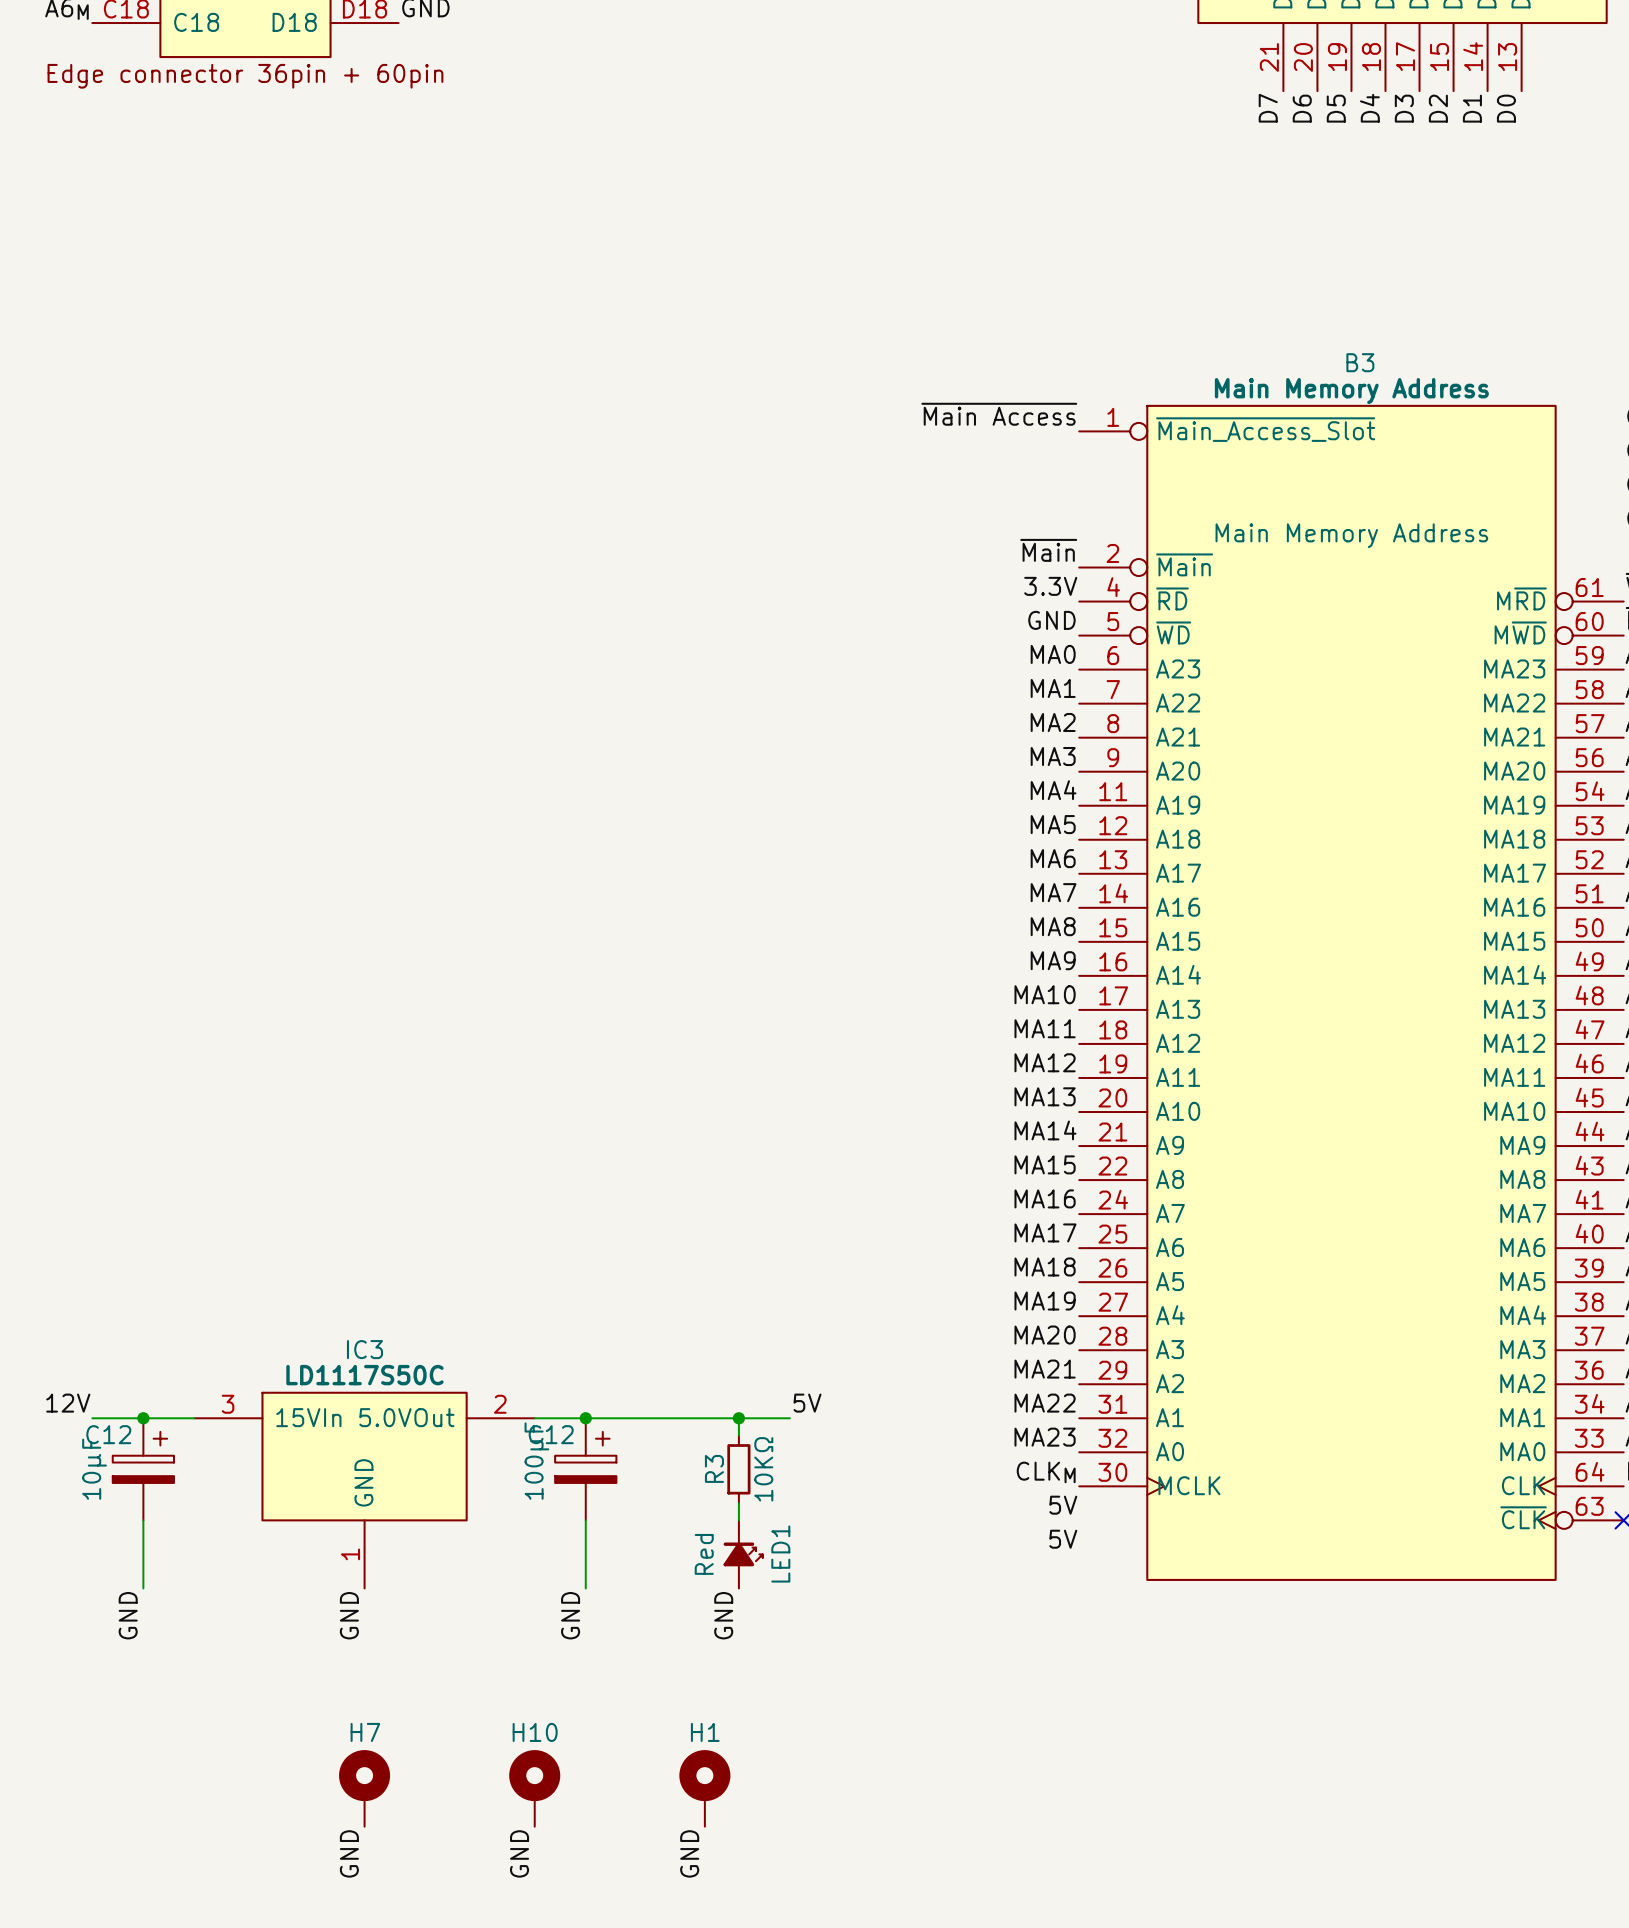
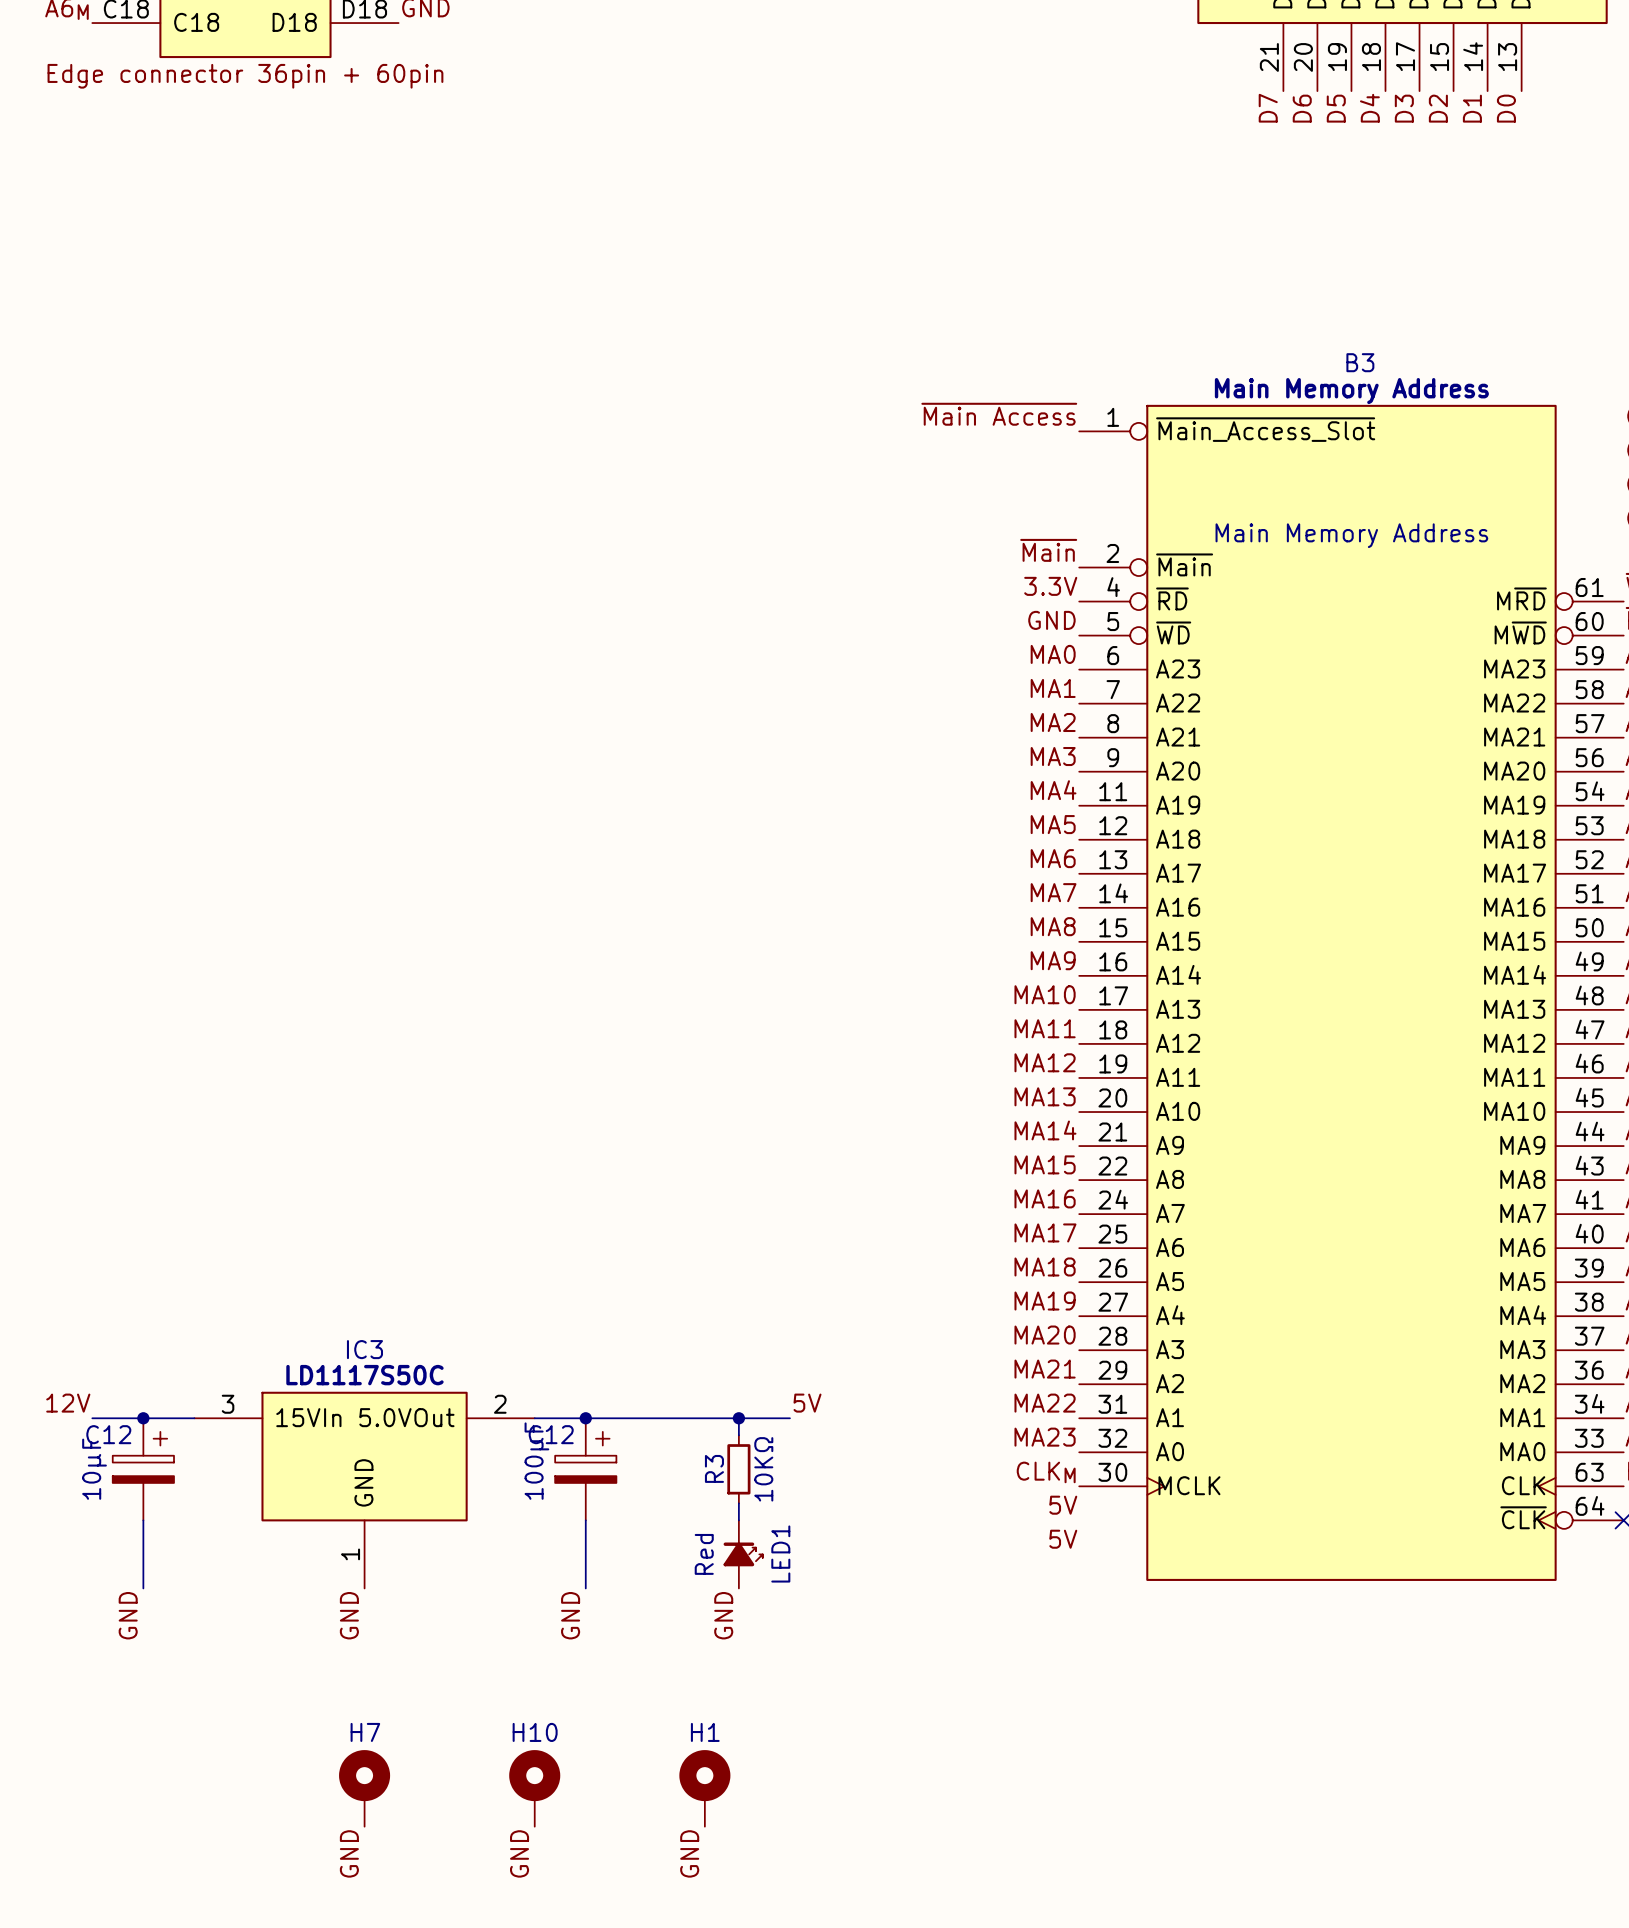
B3 pin number: 64 (1590, 1471) -> 63 (1589, 1472)
B3 pin number: 63 (1589, 1506) -> 64 (1590, 1505)

